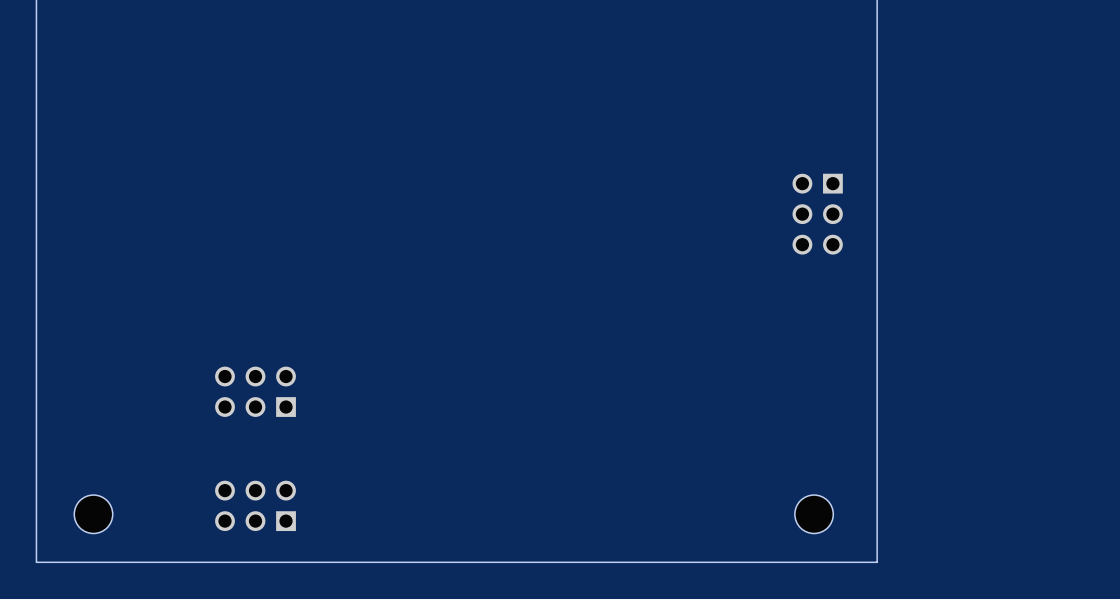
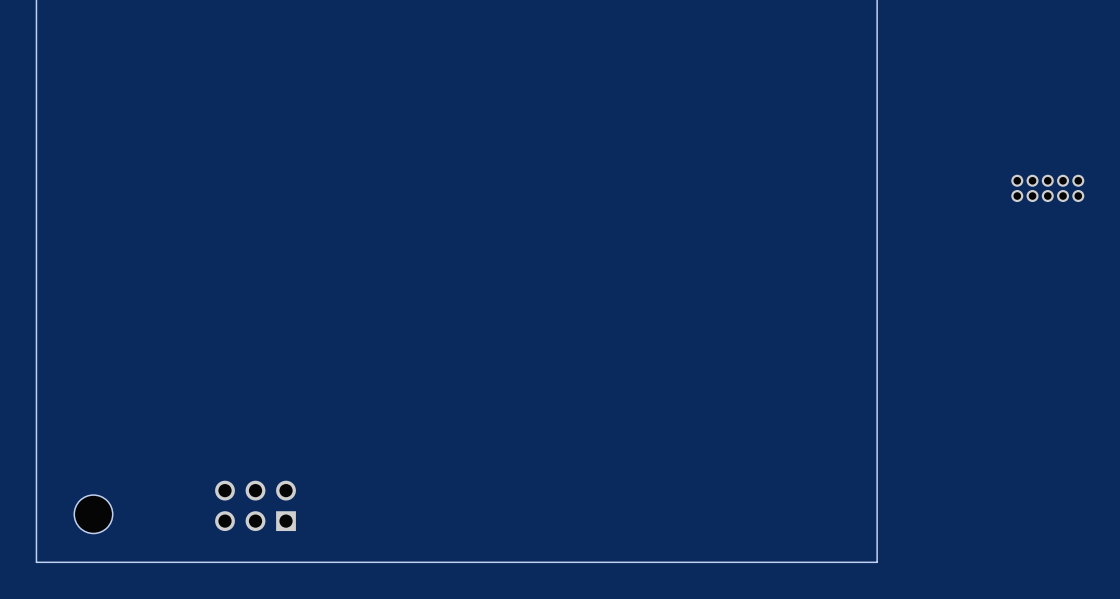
part: none -> (1047, 188)
part: (817, 214) -> none
part: (255, 391) -> none
part: (814, 514) -> none

